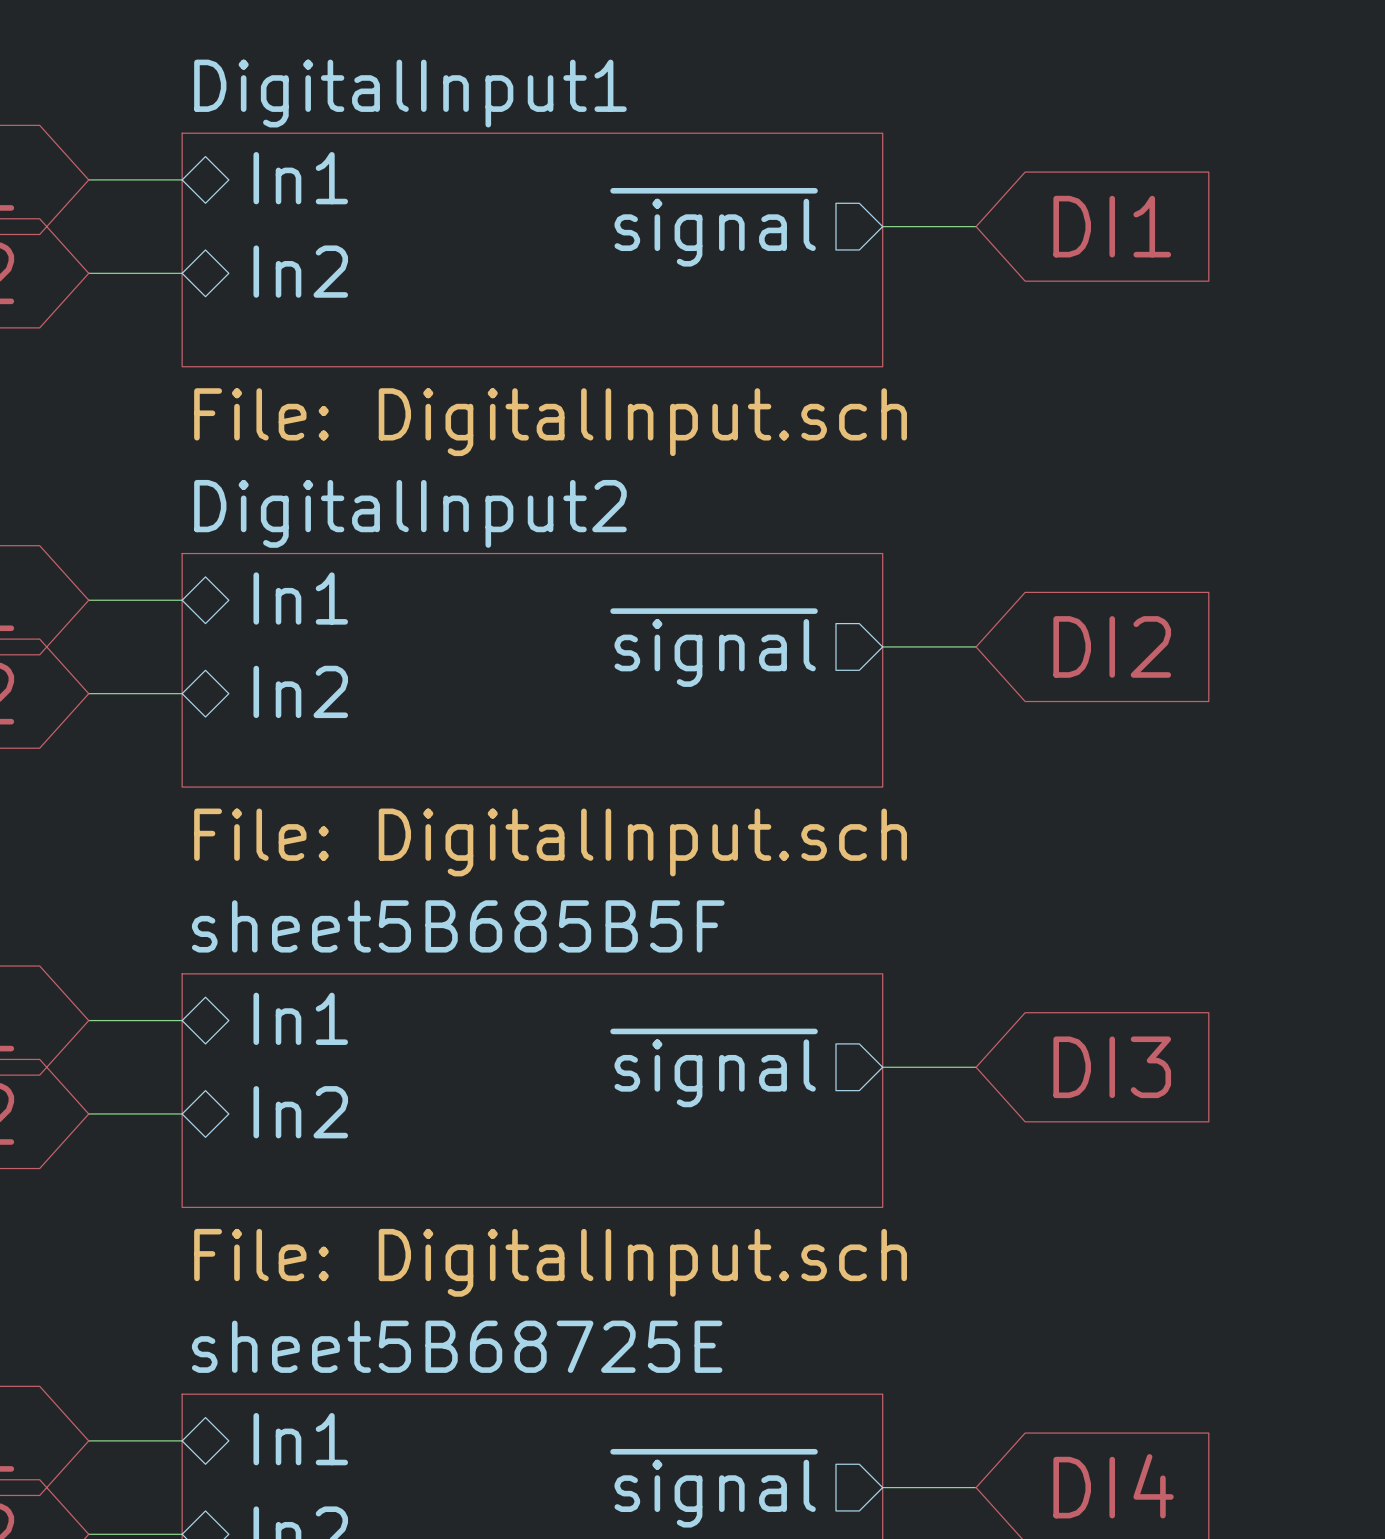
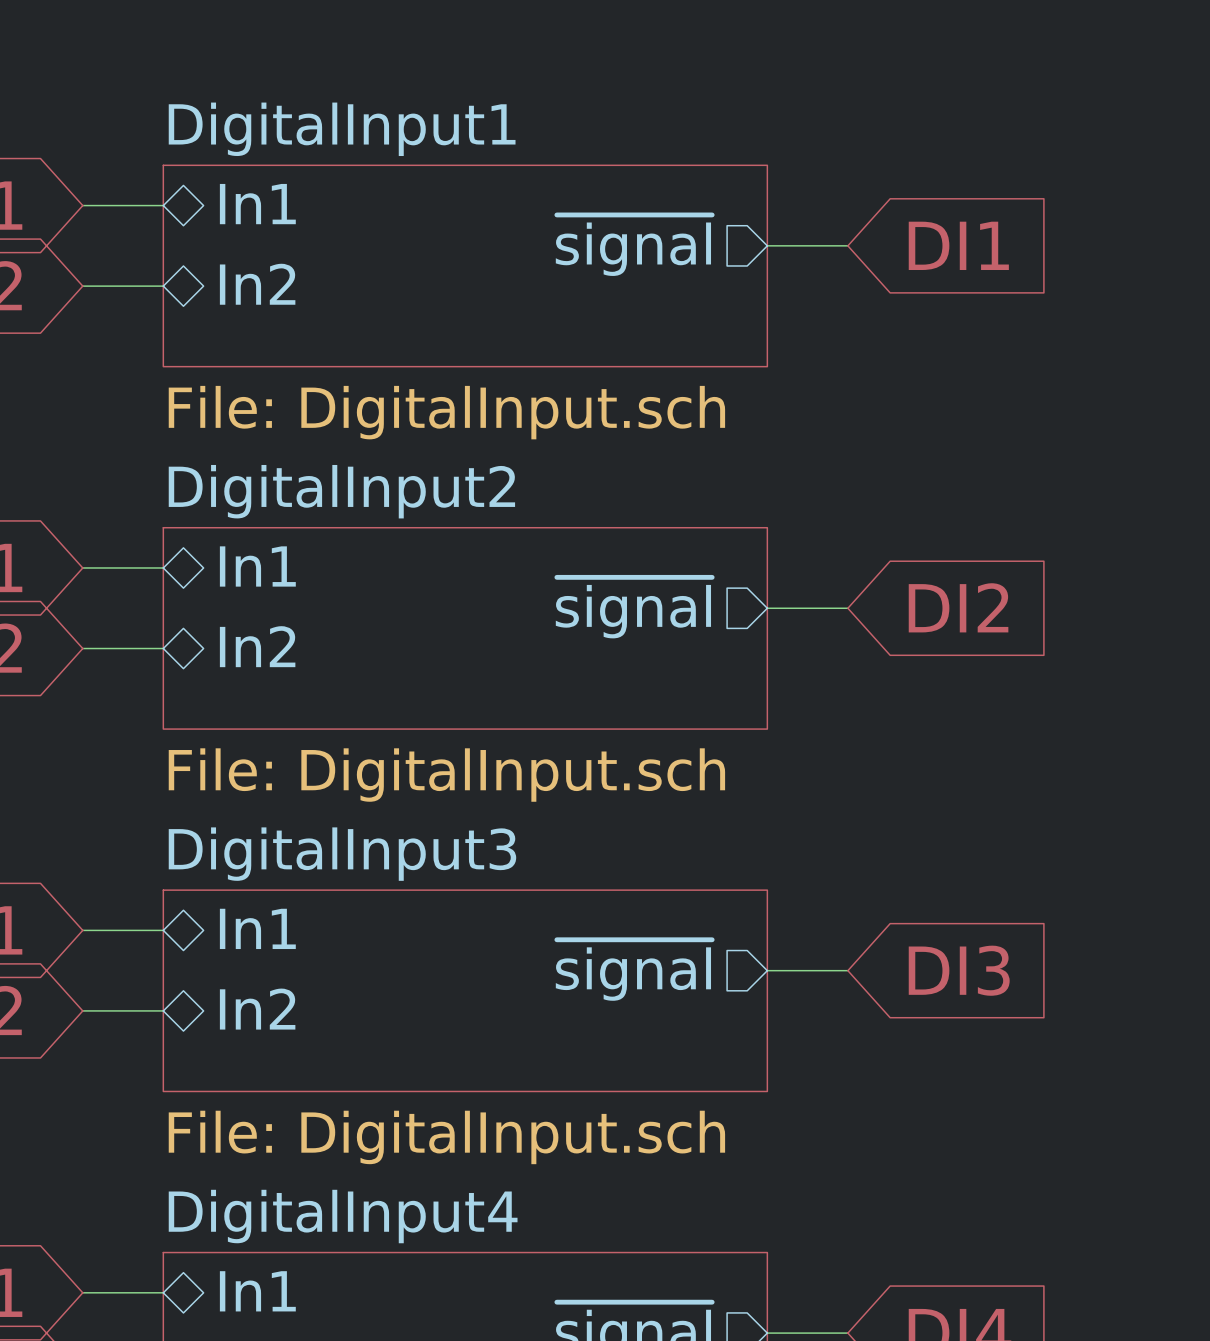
sheet sheet5B685B5F name: sheet5B685B5F (458, 926) -> DigitalInput3 (342, 854)
sheet sheet5B68725E name: sheet5B68725E (457, 1346) -> DigitalInput4 (343, 1216)

